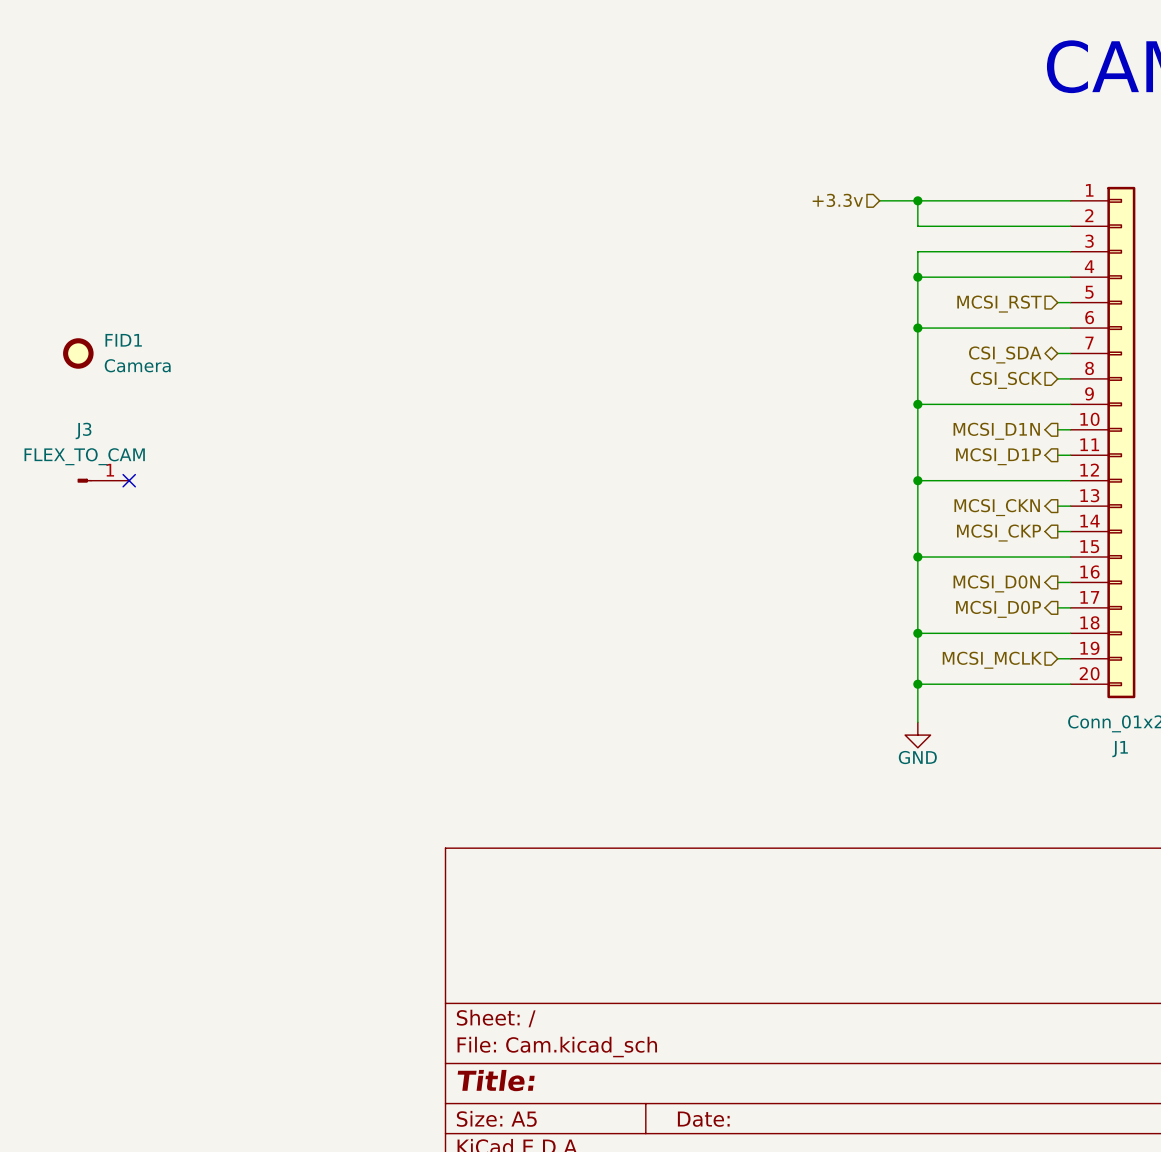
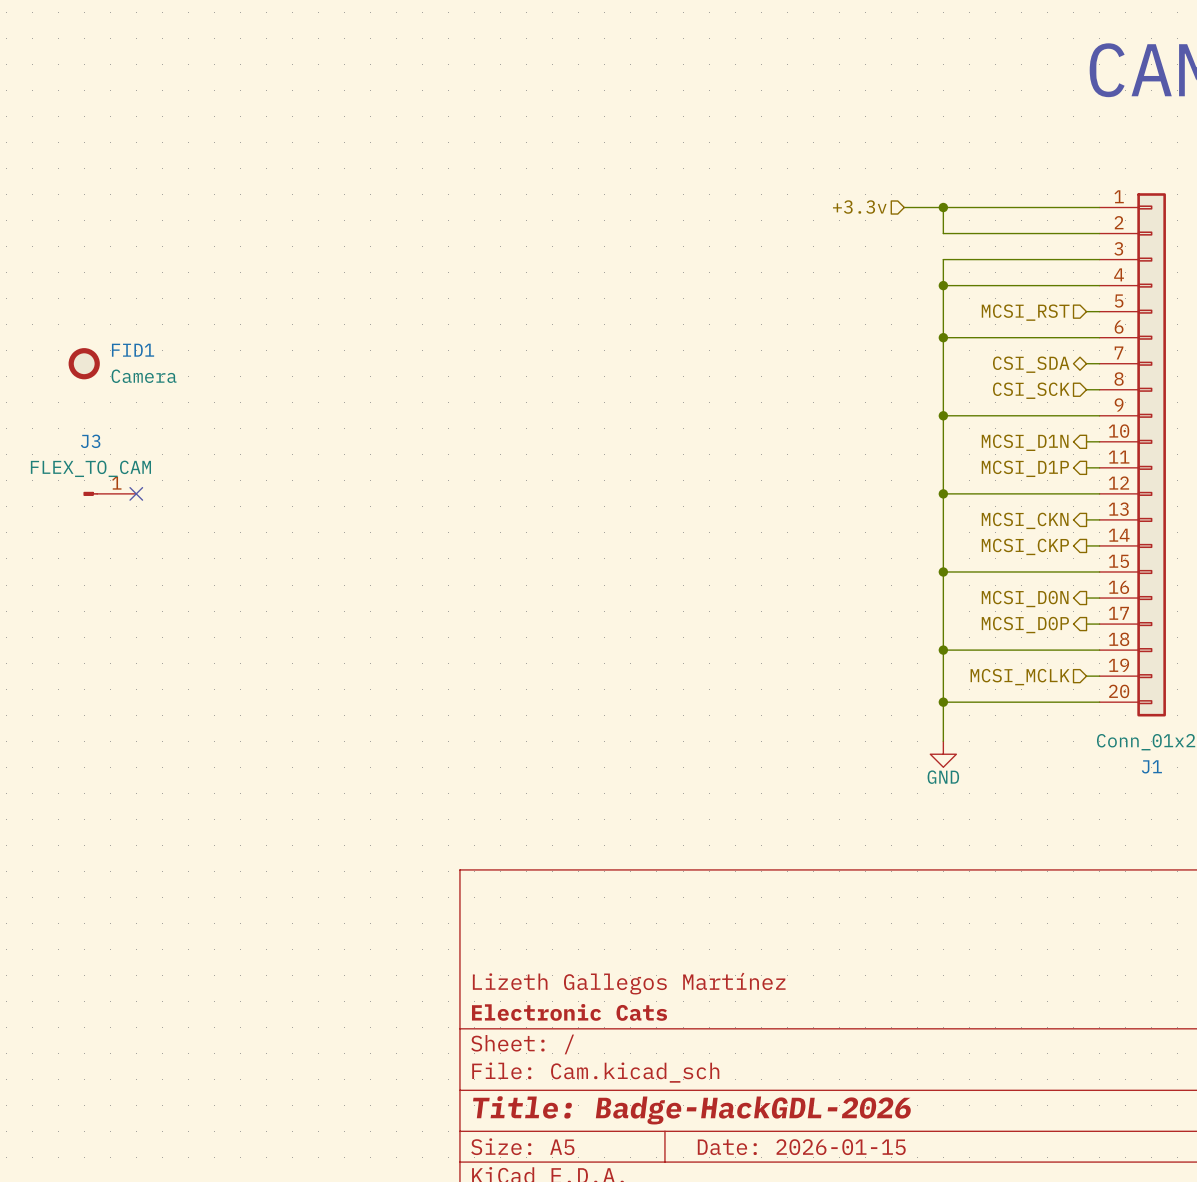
title block: none -> Lizeth Gallegos Martínez (629, 983)
title block: none -> Electronic Cats (569, 1012)
title block: Title: (496, 1080) -> Title: Badge-HackGDL-2026 (691, 1110)
title block: Date: (703, 1119) -> Date: 2026-01-15 (801, 1147)

